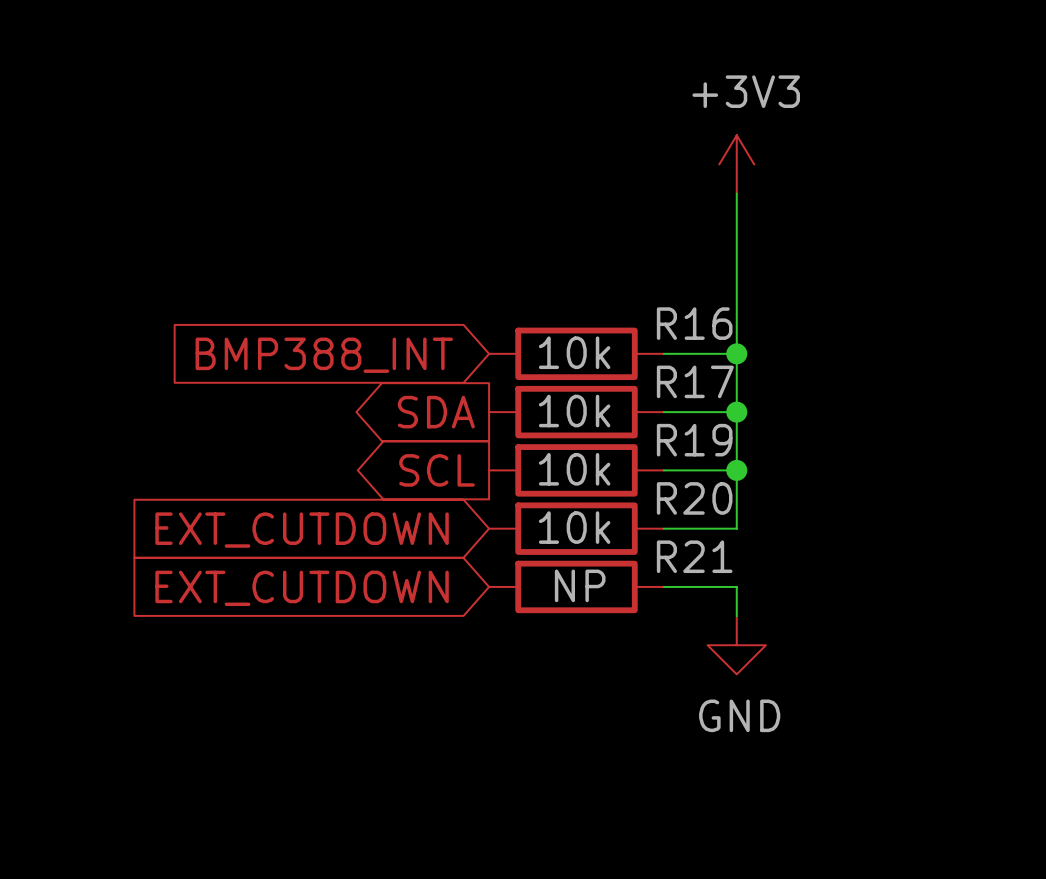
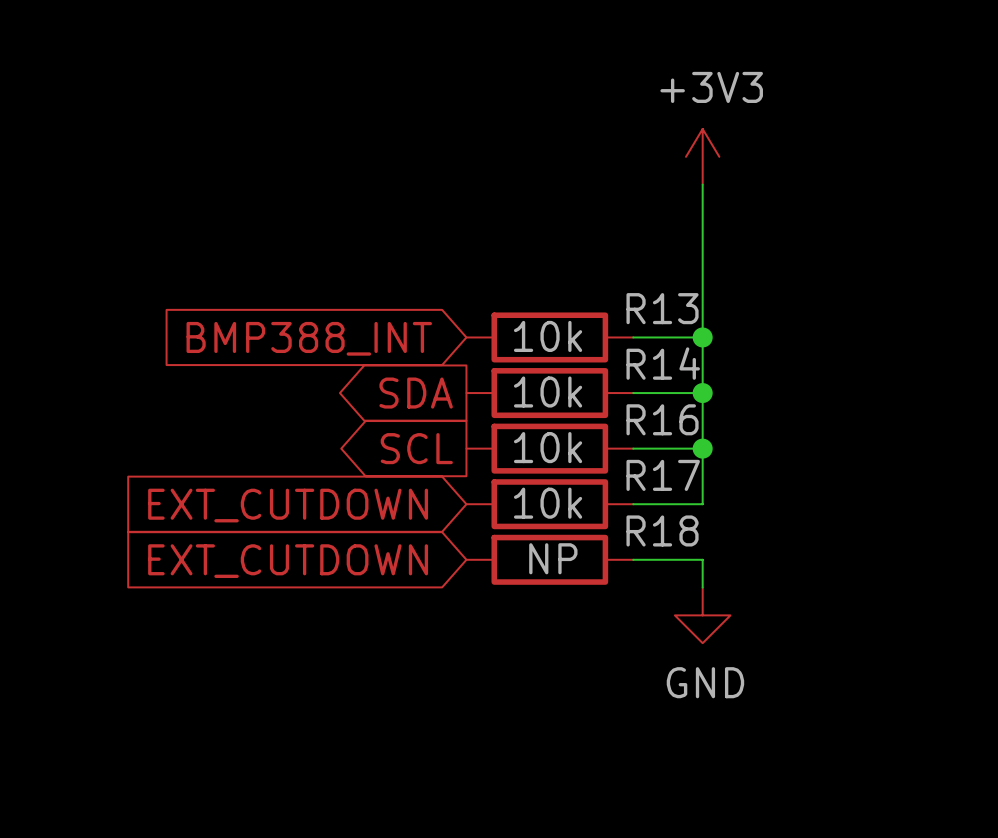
R16 name: R16 (694, 323) -> R13 (662, 308)
R17 name: R17 (695, 381) -> R14 (663, 363)
R19 name: R19 (694, 440) -> R16 (662, 419)
R20 name: R20 (694, 498) -> R17 (663, 475)
R21 name: R21 (694, 556) -> R18 (662, 530)

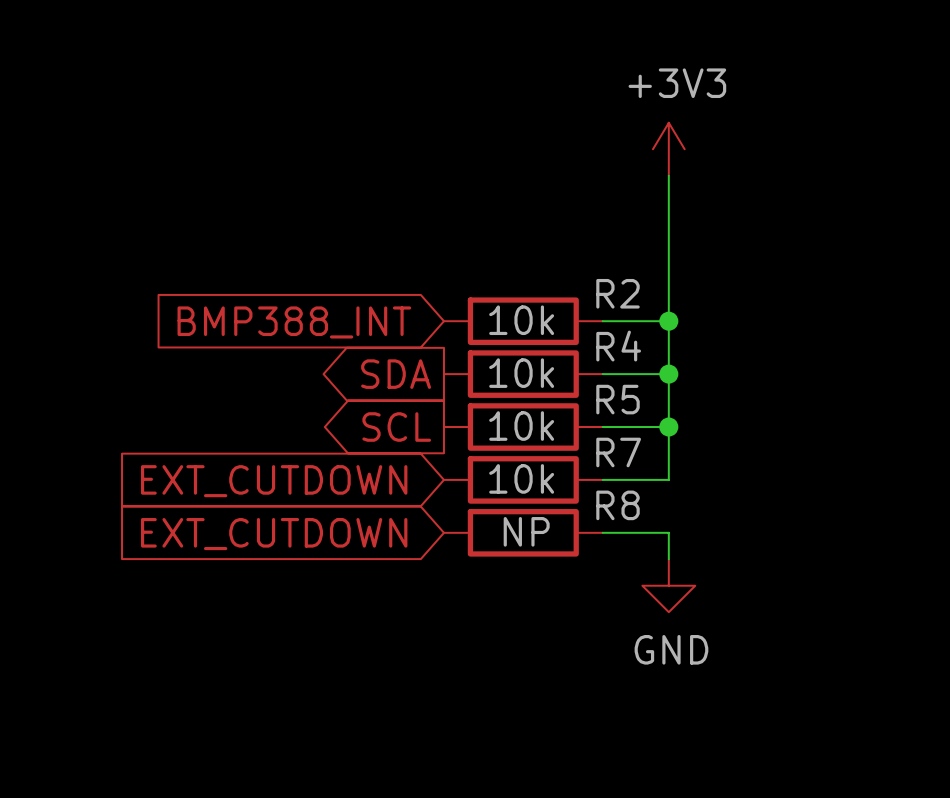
R13 name: R13 (662, 308) -> R2 (618, 293)
R14 name: R14 (663, 363) -> R4 (618, 346)
R16 name: R16 (662, 419) -> R5 (618, 399)
R17 name: R17 (663, 475) -> R7 (618, 452)
R18 name: R18 (662, 530) -> R8 (618, 505)

